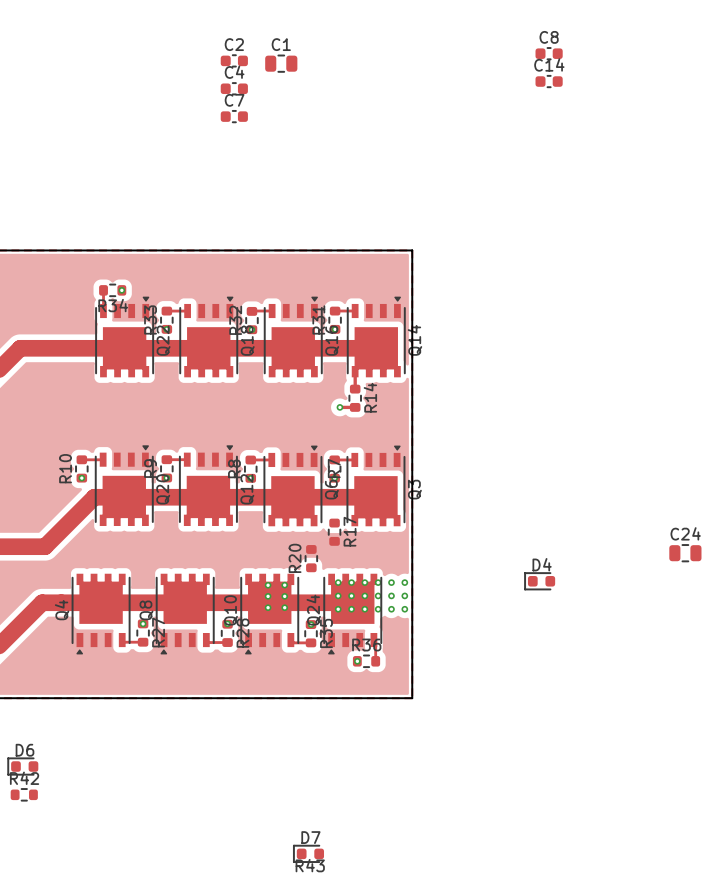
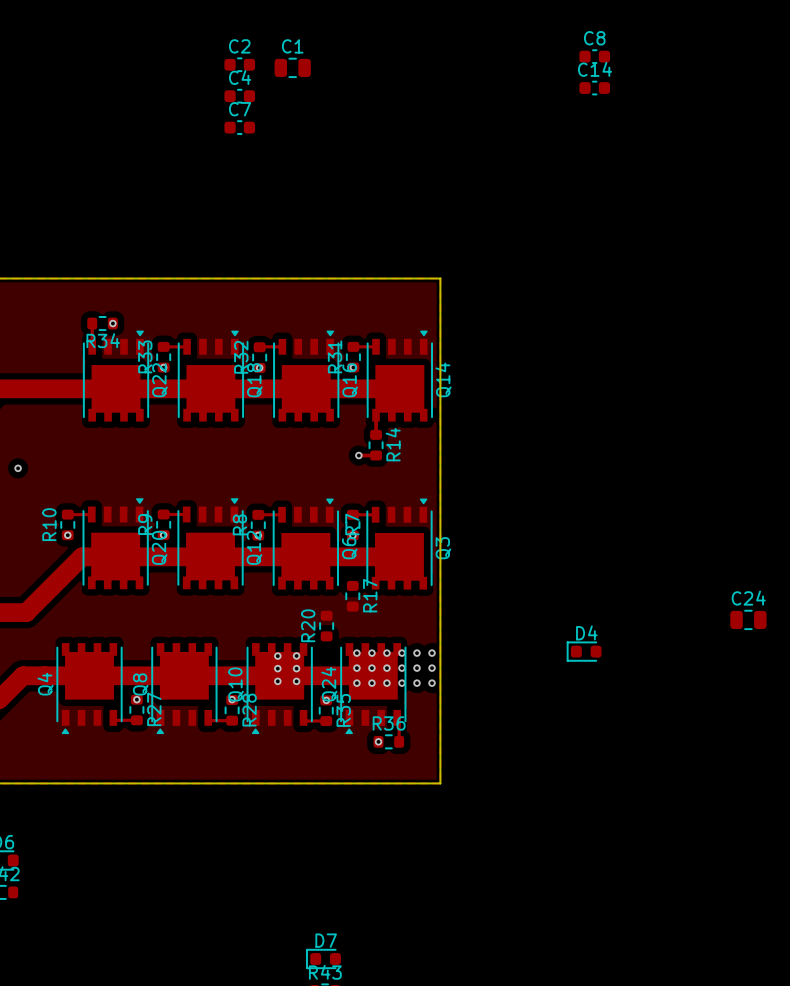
via: none -> (18, 468)

